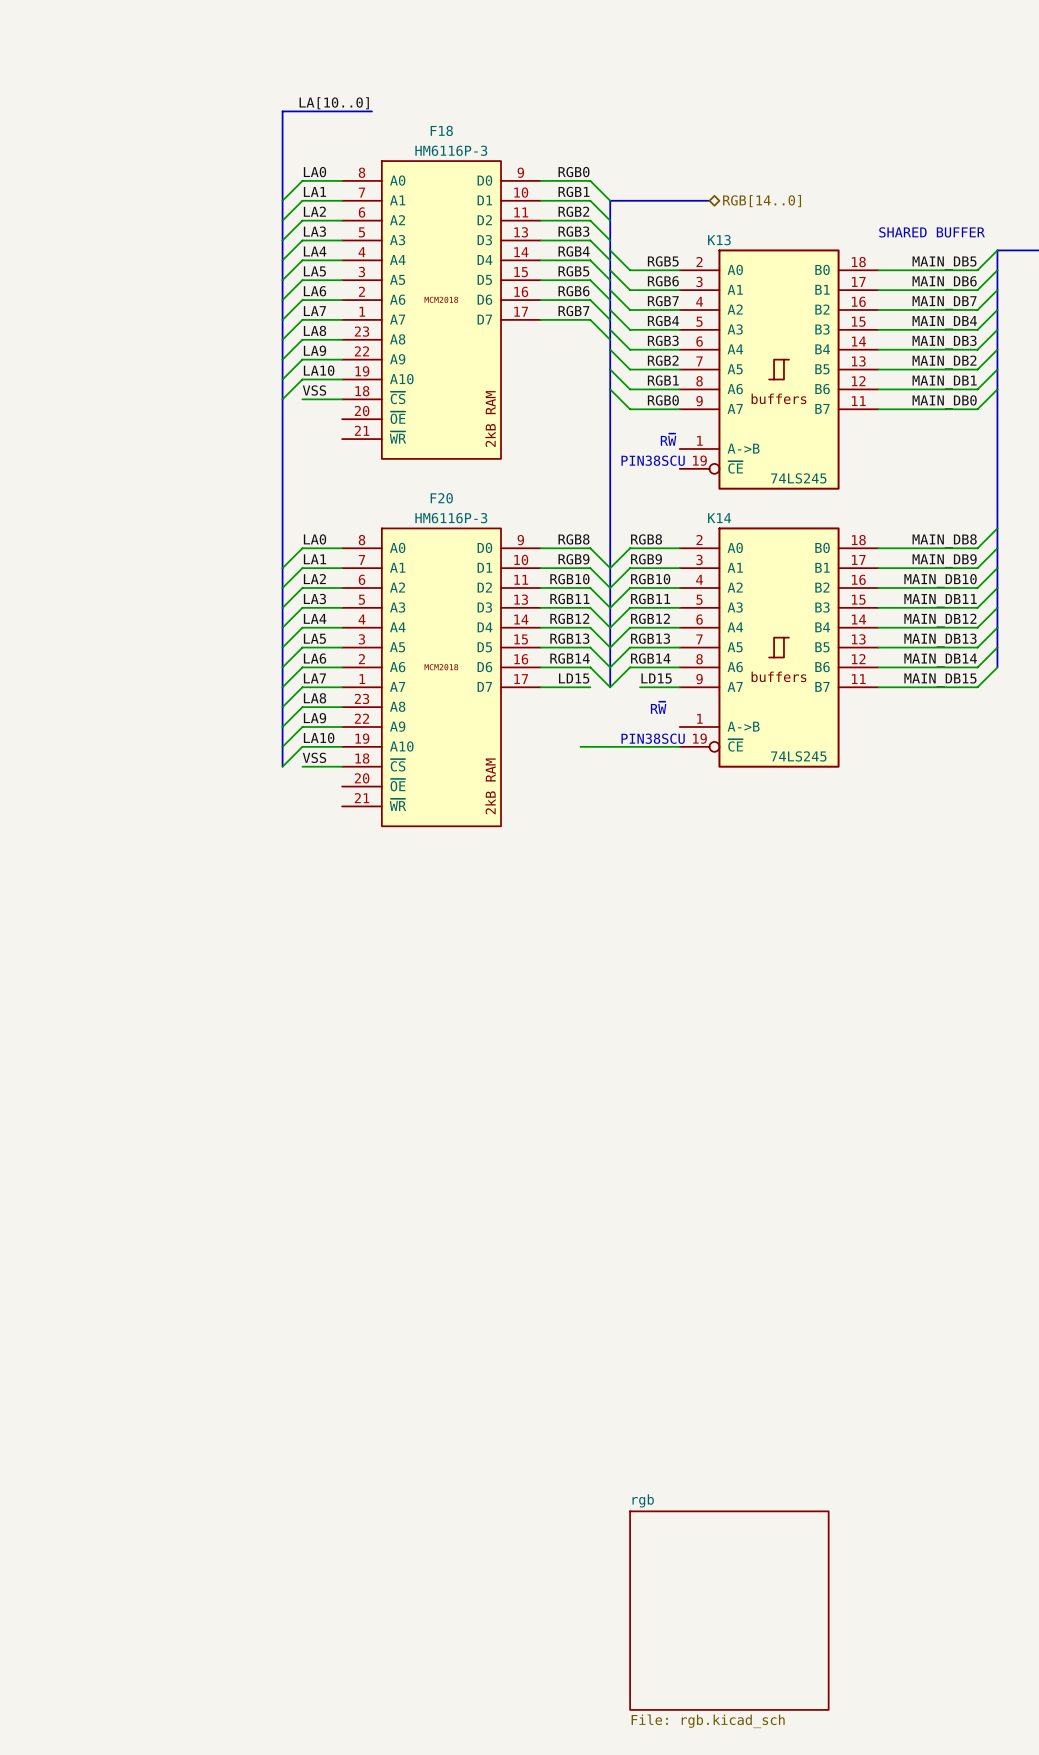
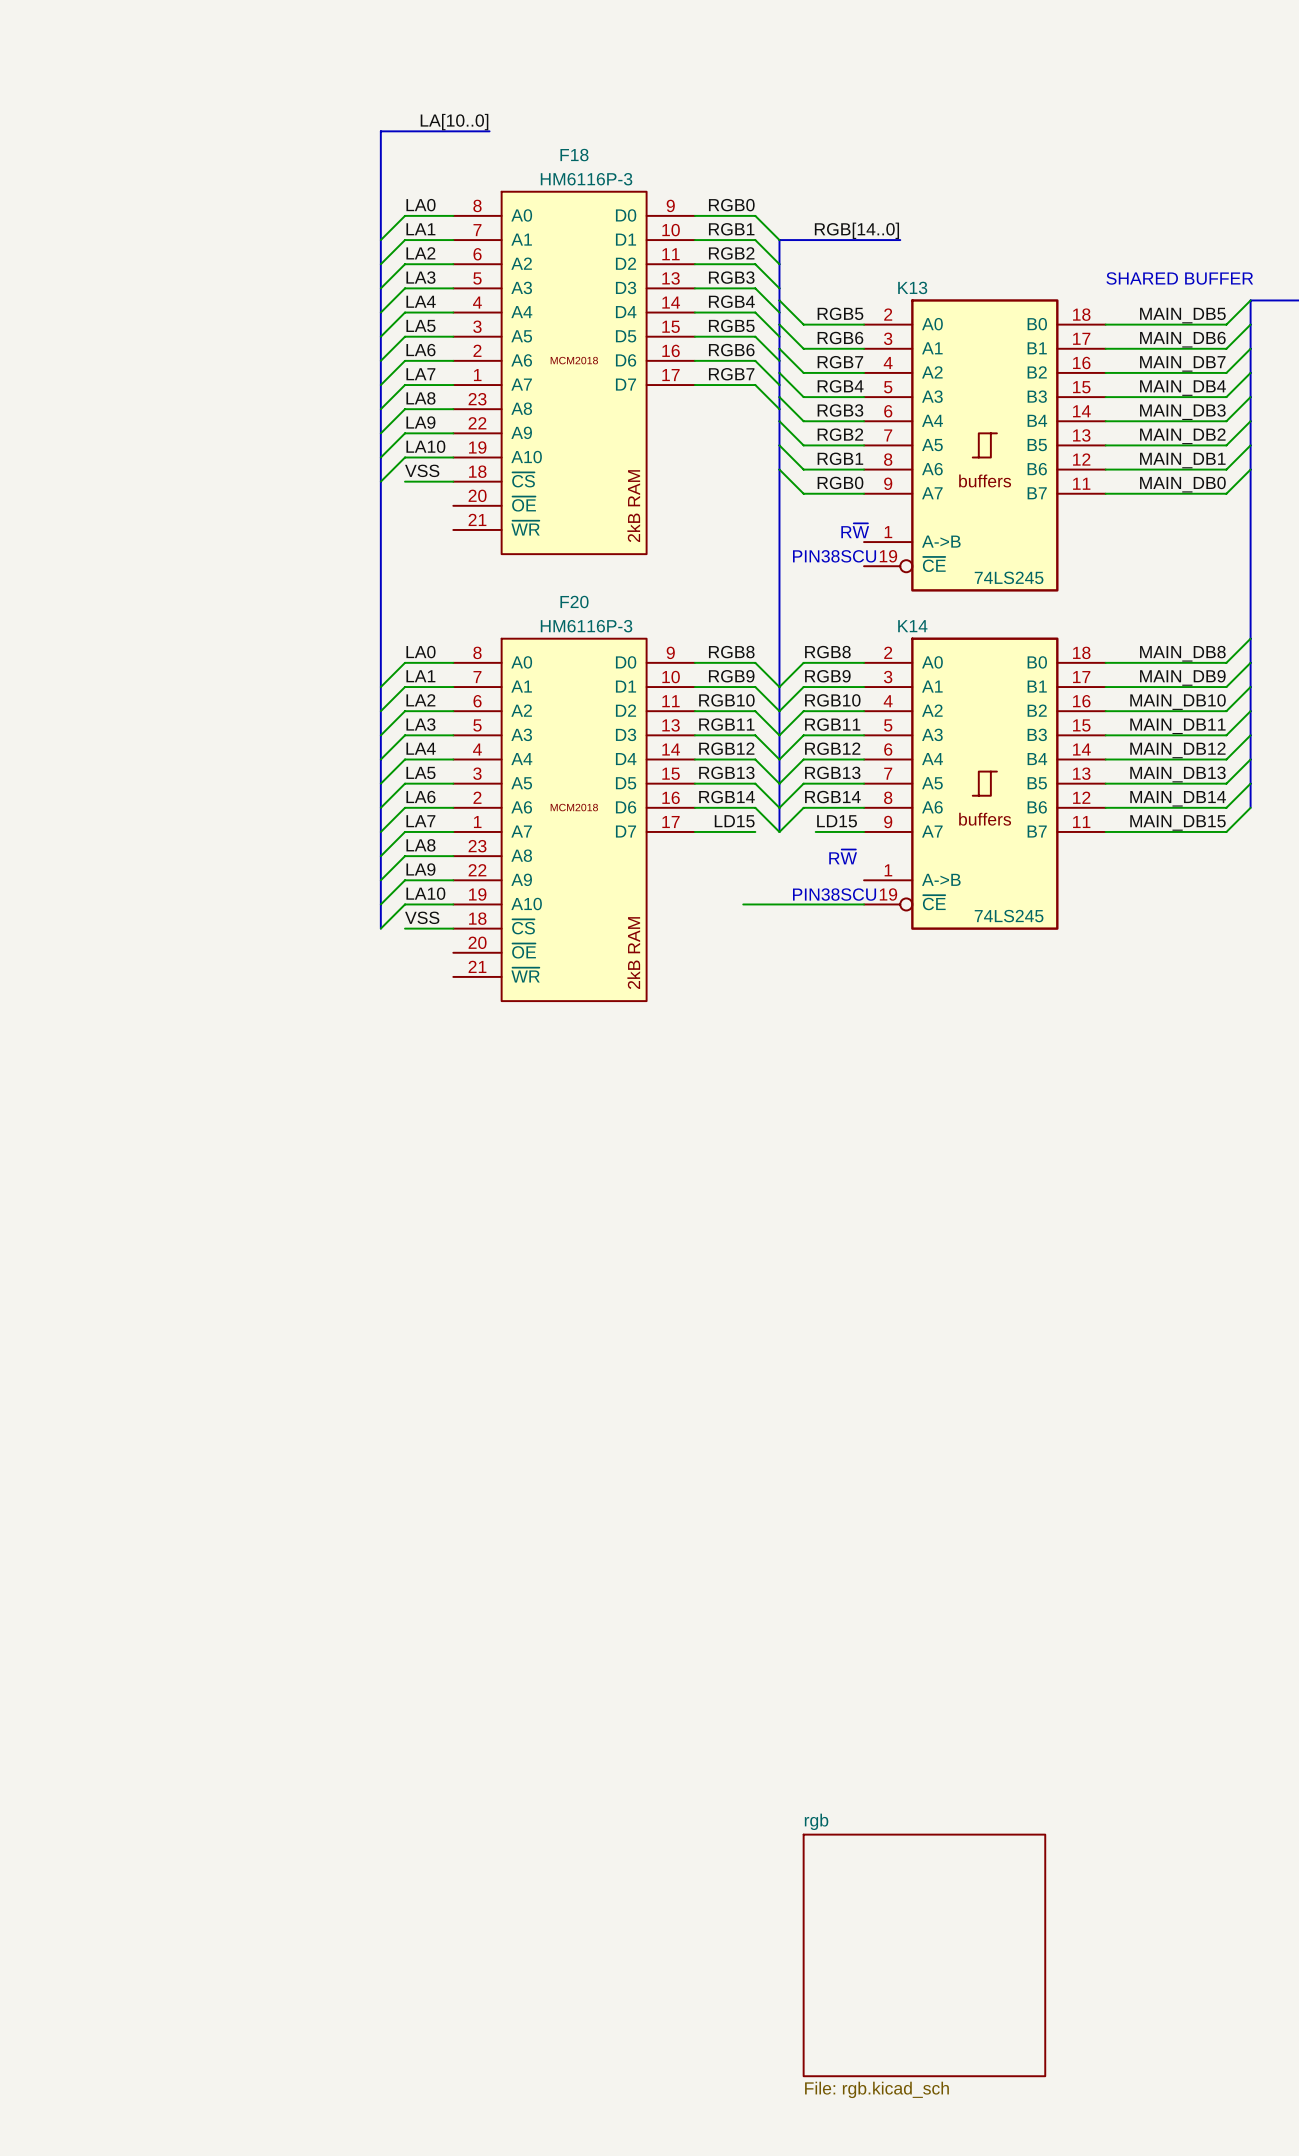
label: none -> RGB[14..0] (856, 230)
hierarchical label: RGB[14..0] (762, 201) -> none

